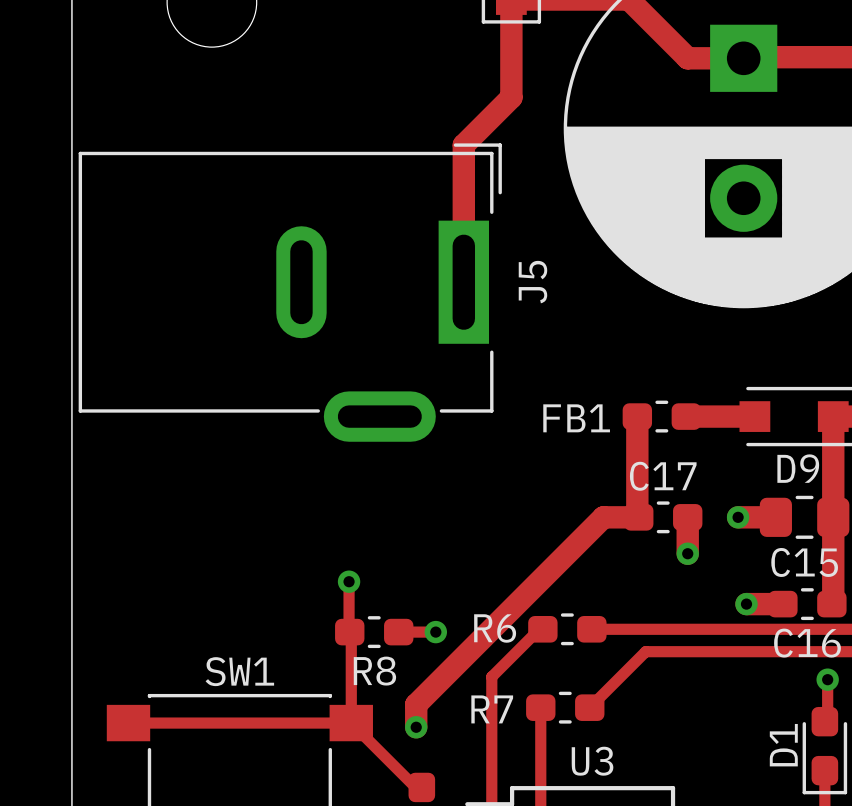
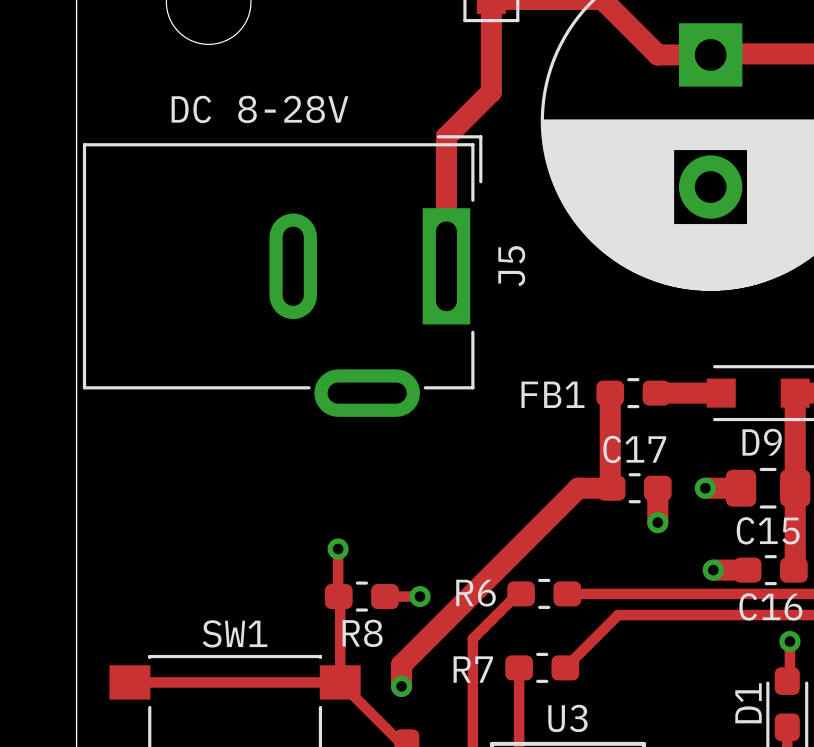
text: none -> DC 8-28V (259, 109)

